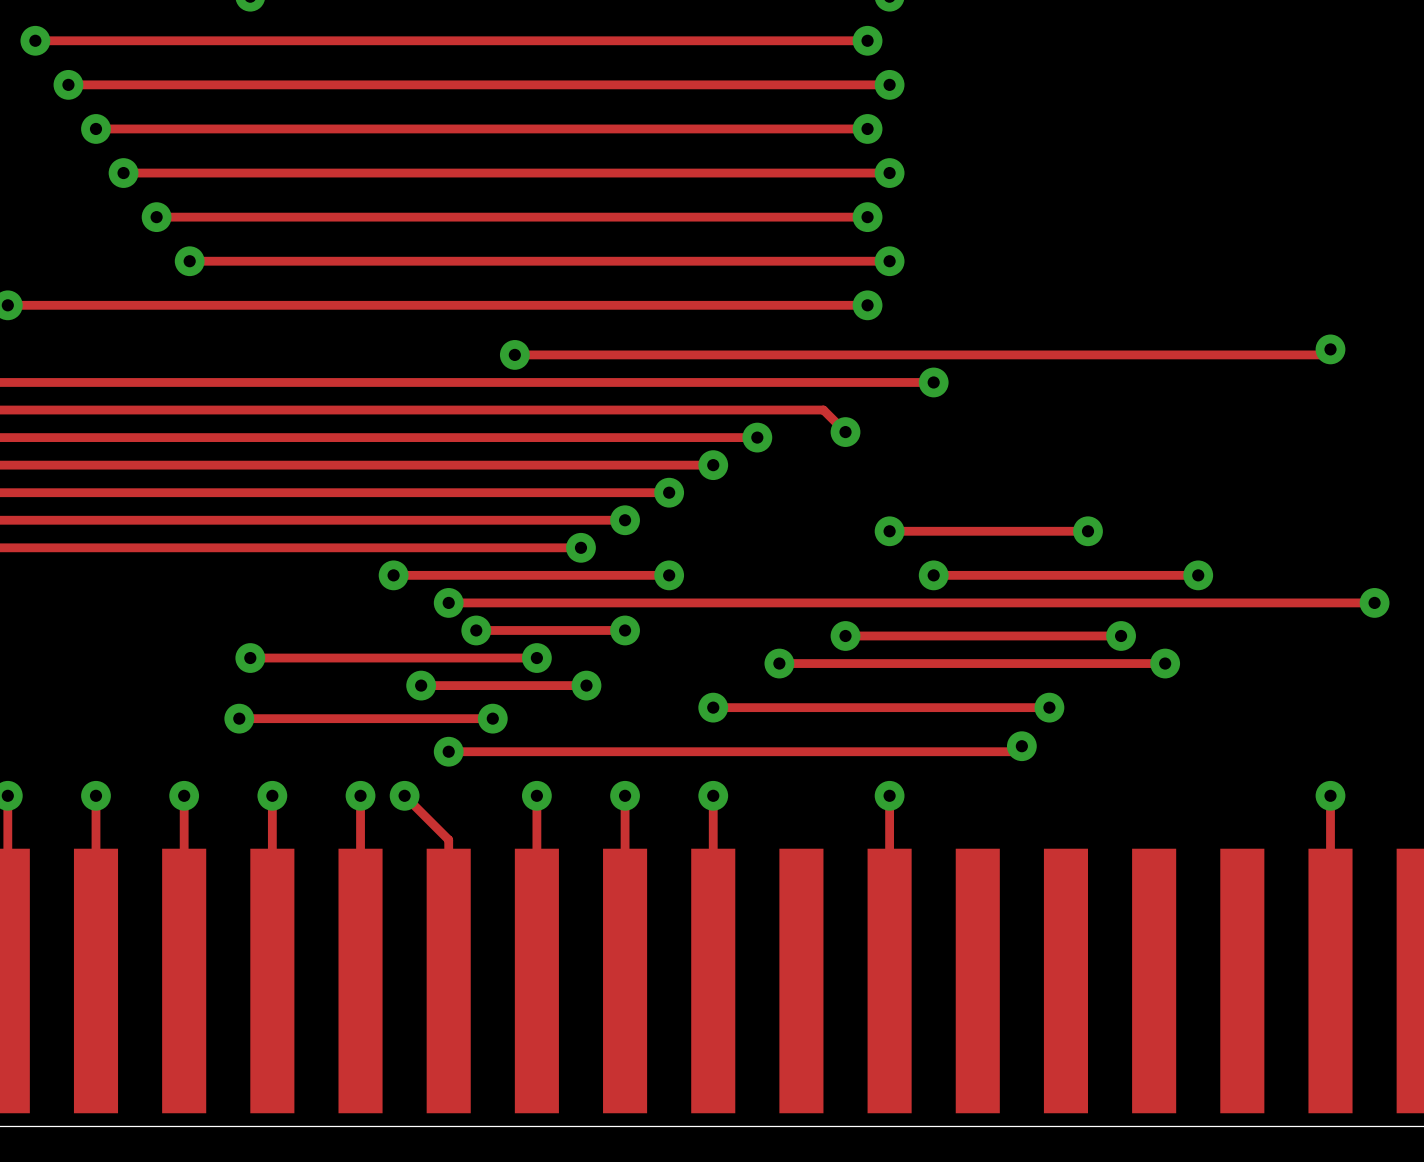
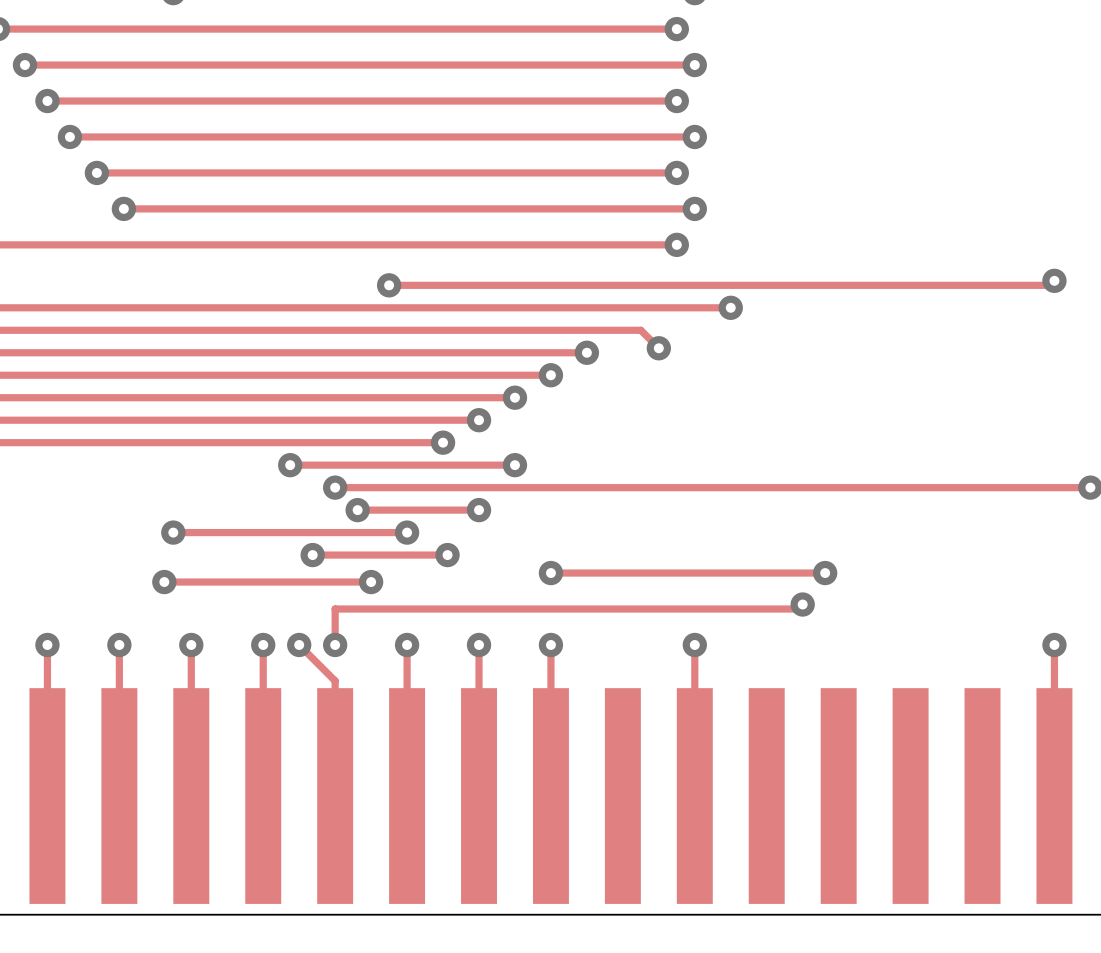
track: (889, 531) (1088, 531) -> none
via: (889, 531) -> none
via: (1088, 531) -> none
track: (933, 575) (1198, 575) -> none
via: (933, 575) -> none
via: (1198, 575) -> none
track: (845, 635) (1121, 635) -> none
via: (845, 635) -> none
via: (1121, 635) -> none
track: (779, 663) (1165, 663) -> none
via: (779, 663) -> none
via: (1165, 663) -> none
track: none -> (335, 609) (335, 644)
via position: (448, 751) -> (335, 644)

